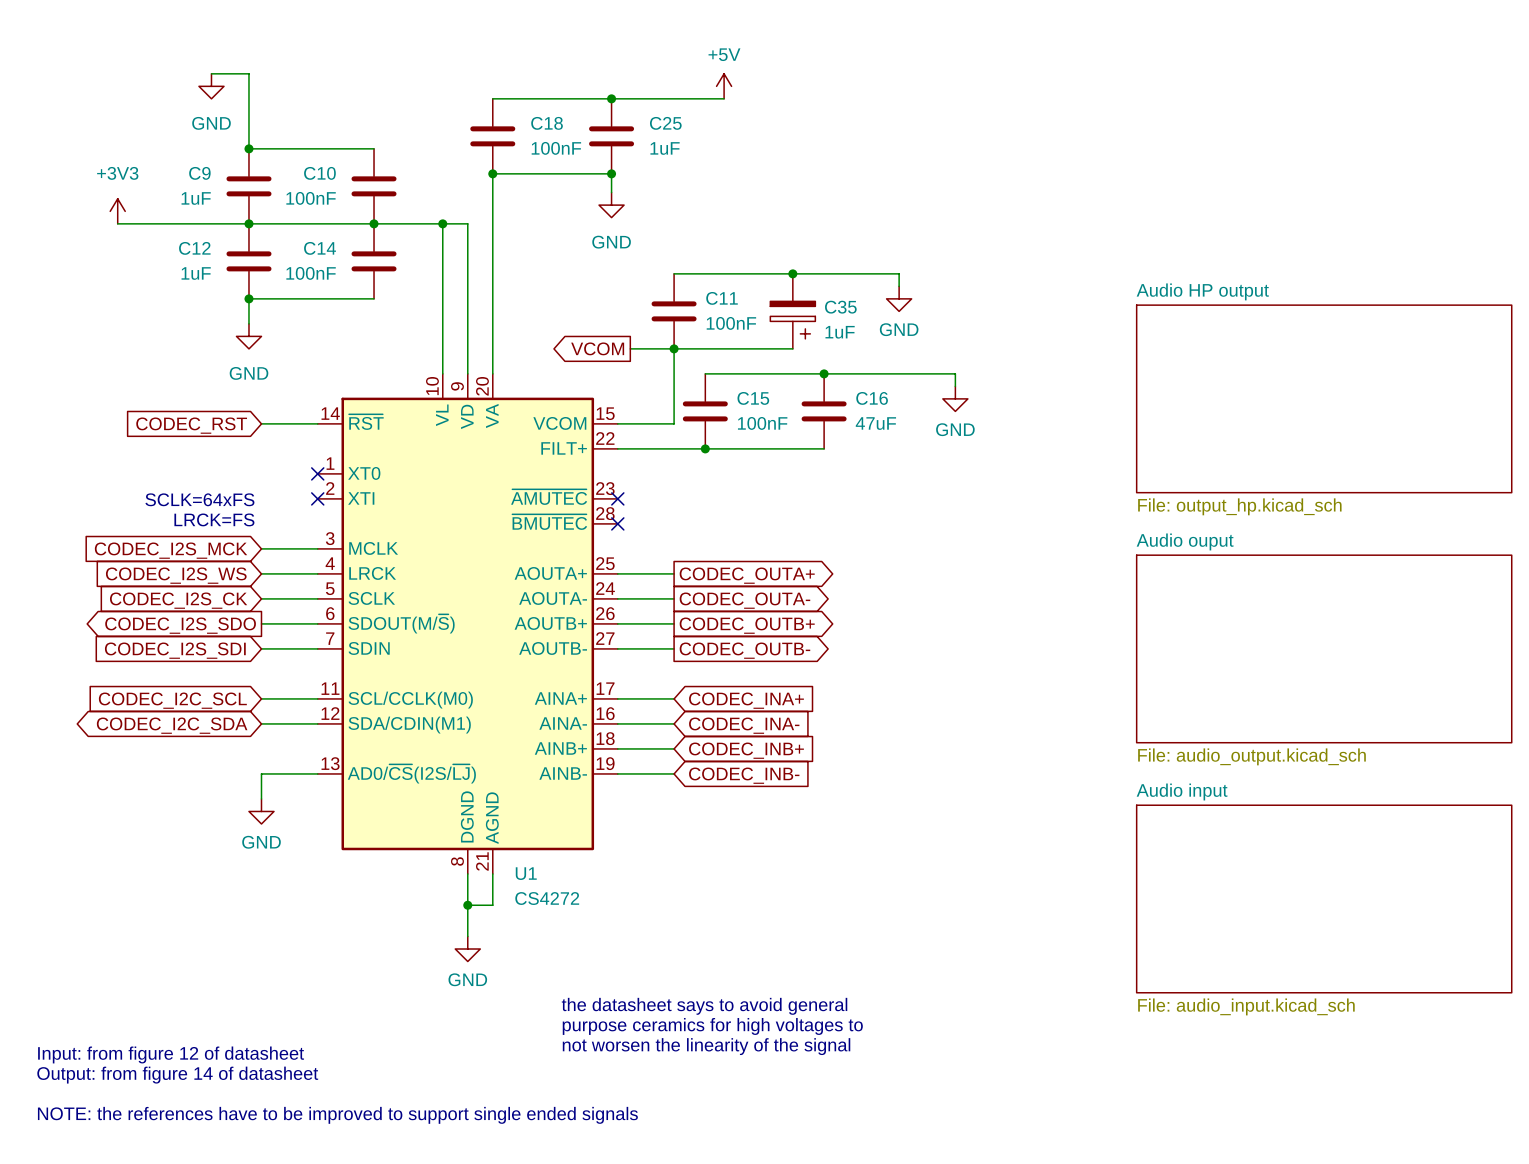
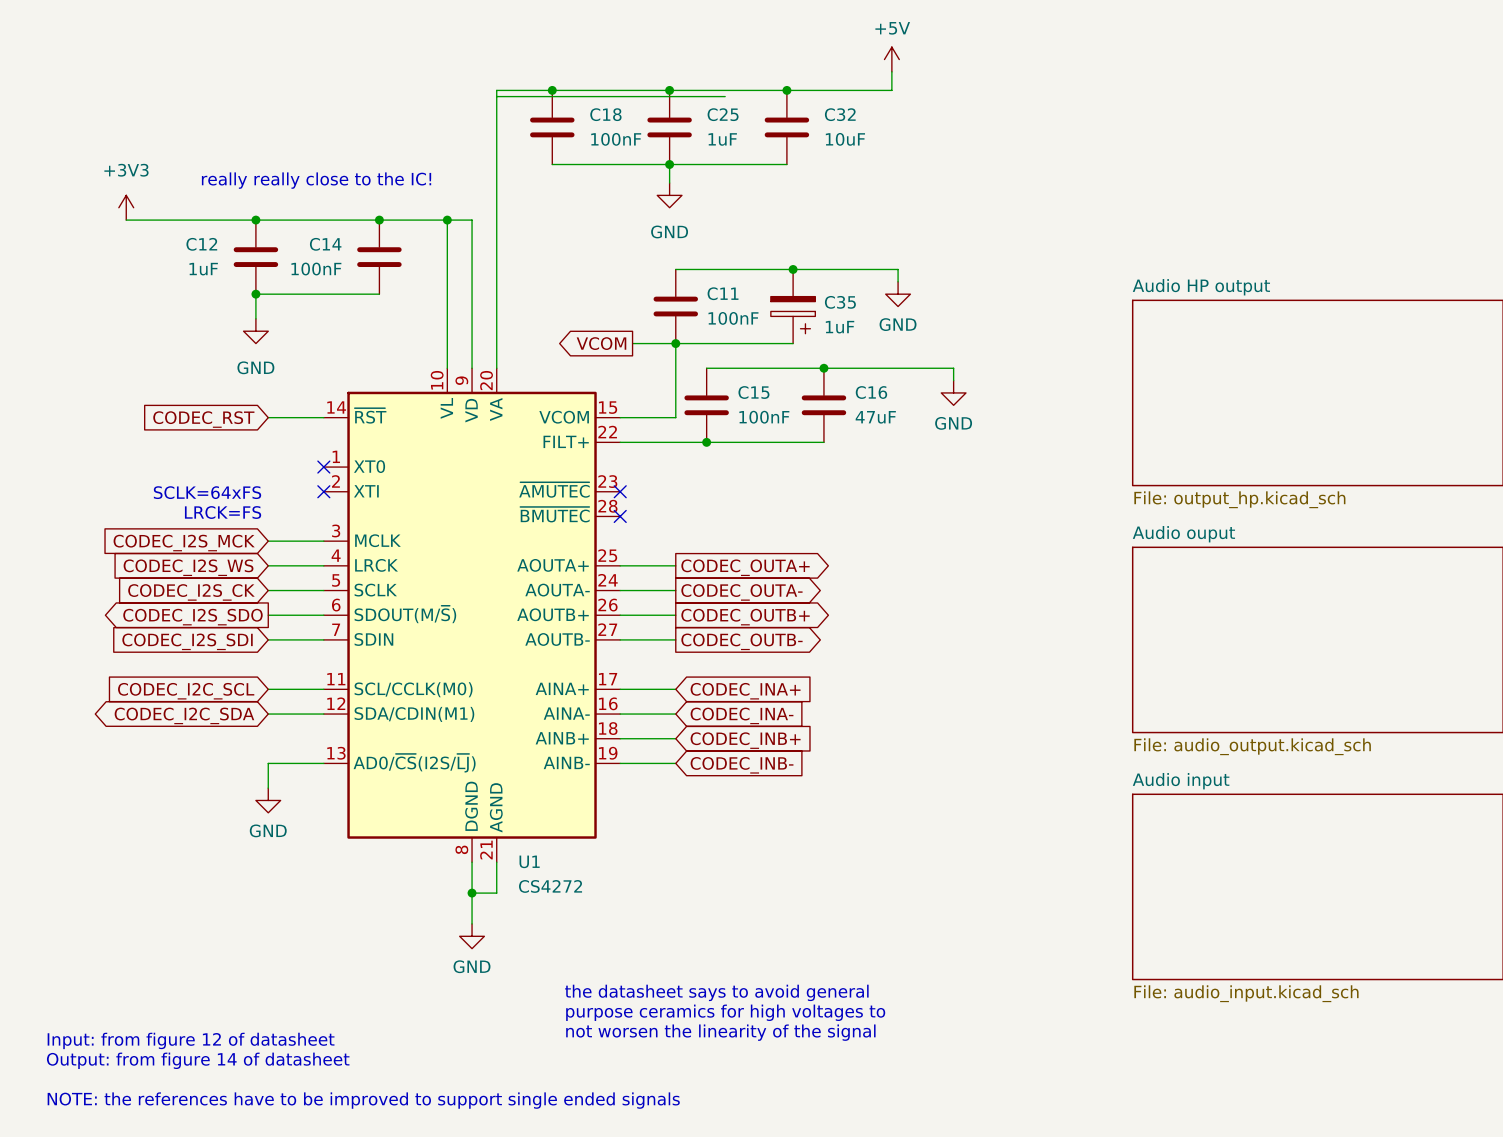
wire: (211, 73) (248, 73) (248, 148) (374, 148) -> none
power symbol: GND (211, 86) -> none
power symbol position: +5V (724, 86) -> +5V (891, 59)
junction: none -> (552, 90)
junction: none -> (669, 90)
junction: none -> (786, 90)
junction: (611, 98) -> none
C32: none -> 10uF (786, 127)
C18 position: (492, 136) -> (552, 127)
C25 position: (611, 136) -> (669, 127)
junction: (248, 148) -> none
wire: none -> (552, 164) (786, 164)
wire: none -> (669, 164) (669, 183)
junction: none -> (669, 164)
wire: (492, 173) (611, 173) (611, 192) -> (496, 170) (496, 90) (891, 90) (891, 71)
junction: (492, 173) -> none
junction: (611, 173) -> none
text: none -> really really close to the IC! (316, 180)
C9: 1uF (248, 186) -> none
C10: 100nF (374, 186) -> none
power symbol position: GND (611, 205) -> GND (669, 195)

